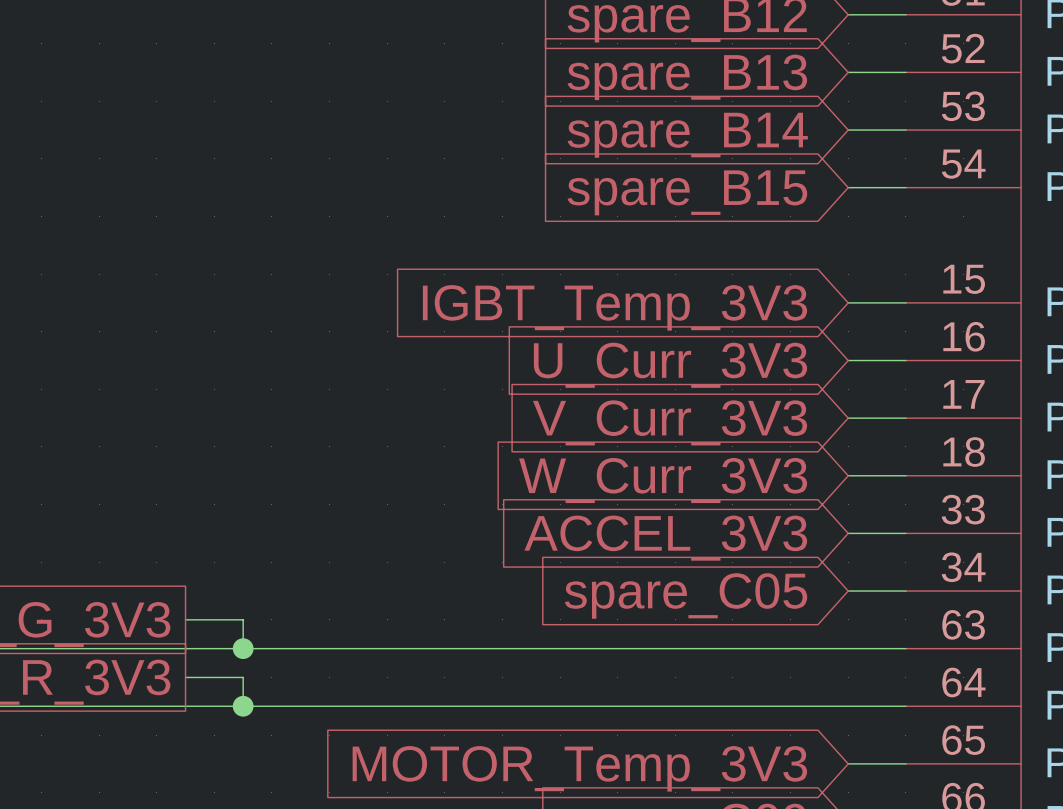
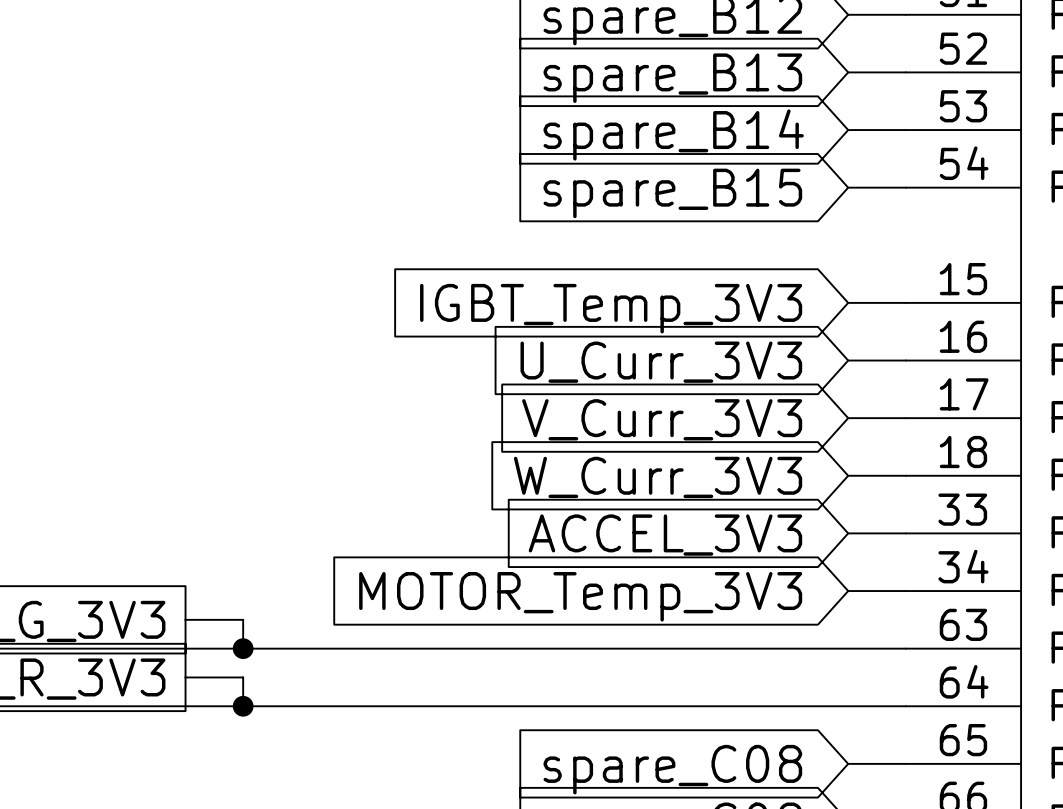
global label: spare_C05 (686, 595) -> MOTOR_Temp_3V3 (580, 596)
global label: MOTOR_Temp_3V3 (579, 768) -> spare_C08 (672, 769)

